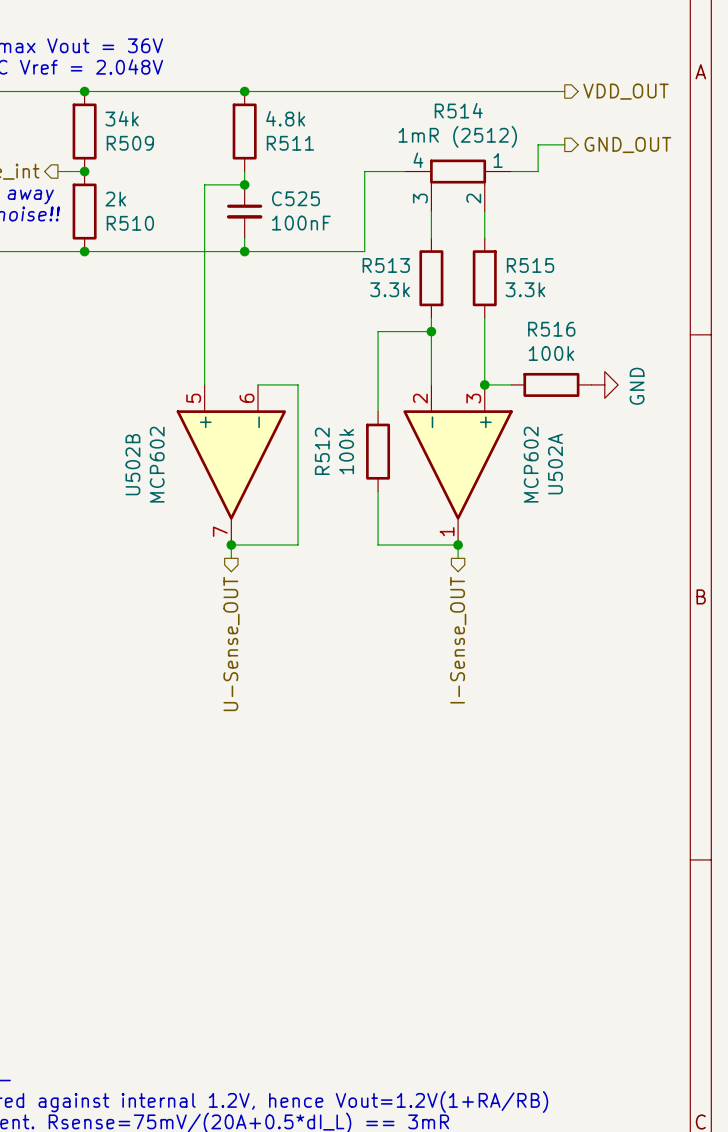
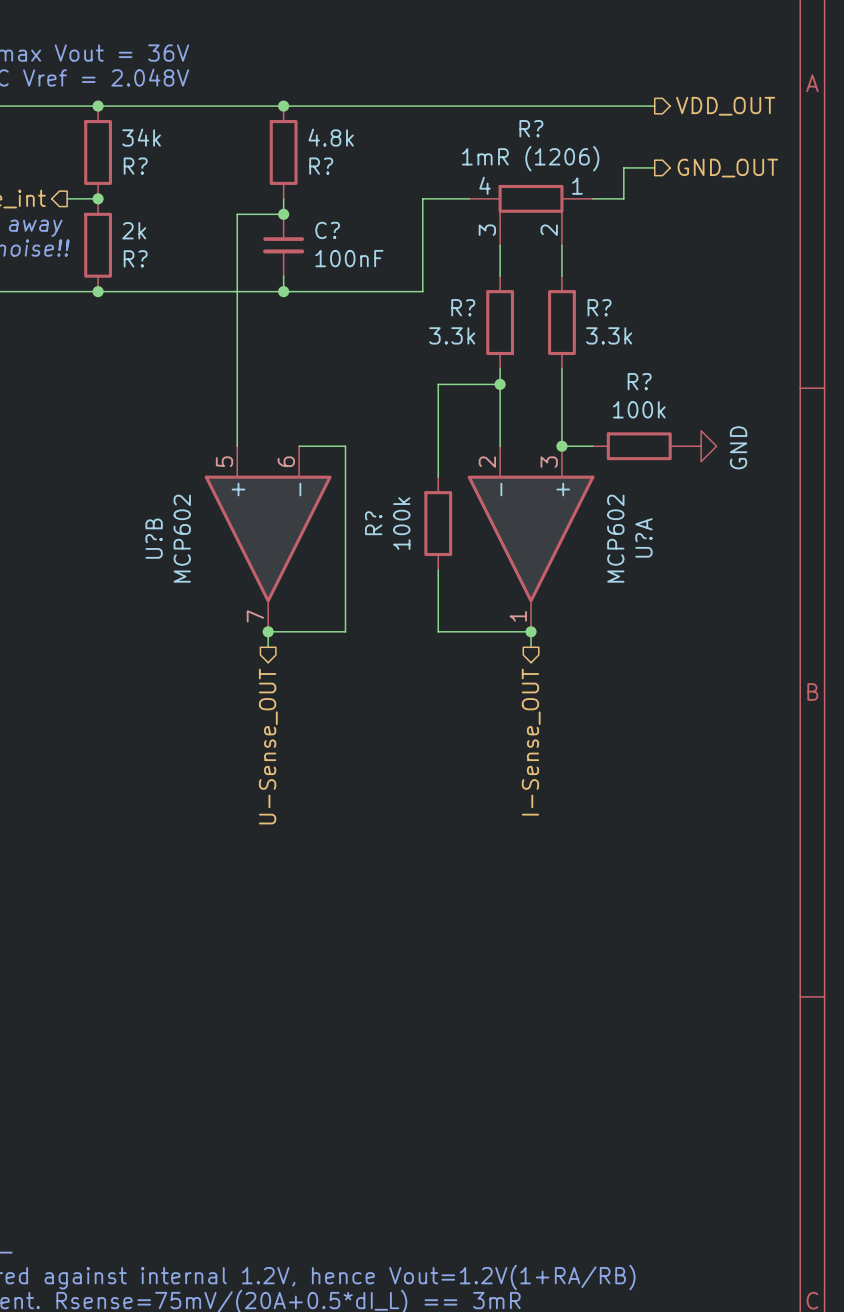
R514 name: R514 (458, 110) -> R? (531, 128)
R514 value: 1mR (2512) (457, 136) -> 1mR (1206) (530, 158)
R509 name: R509 (130, 143) -> R? (135, 166)
R511 name: R511 (290, 143) -> R? (321, 166)
C525 name: C525 (295, 198) -> C? (327, 230)
R510 name: R510 (130, 223) -> R? (135, 258)
R513 name: R513 (386, 265) -> R? (463, 307)
R515 name: R515 (530, 265) -> R? (599, 307)
R516 name: R516 (551, 329) -> R? (639, 381)
R512 name: R512 (322, 451) -> R? (373, 523)
U502B name: U502B (132, 464) -> U?B (154, 538)
U502A name: U502A (555, 464) -> U?A (643, 537)

